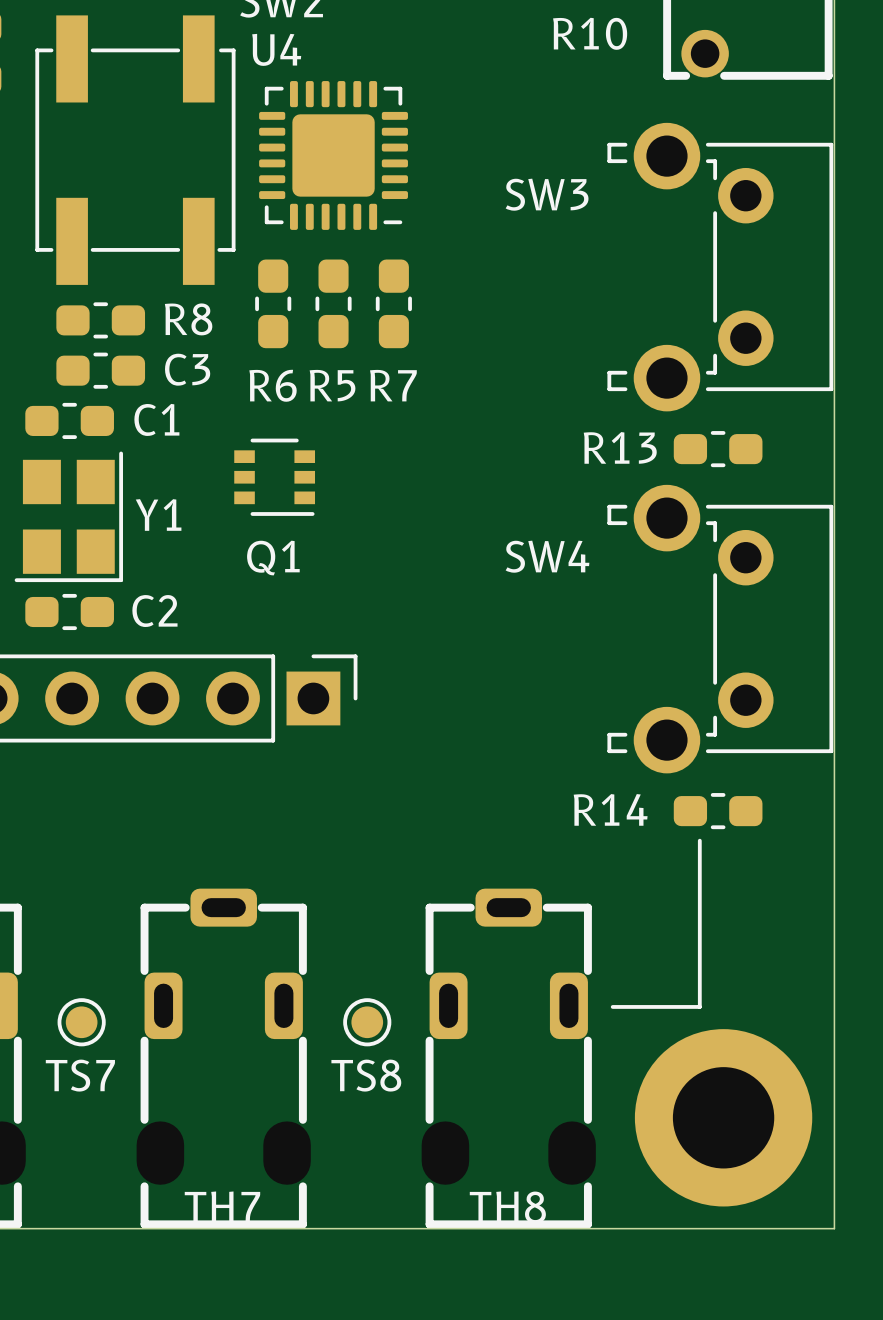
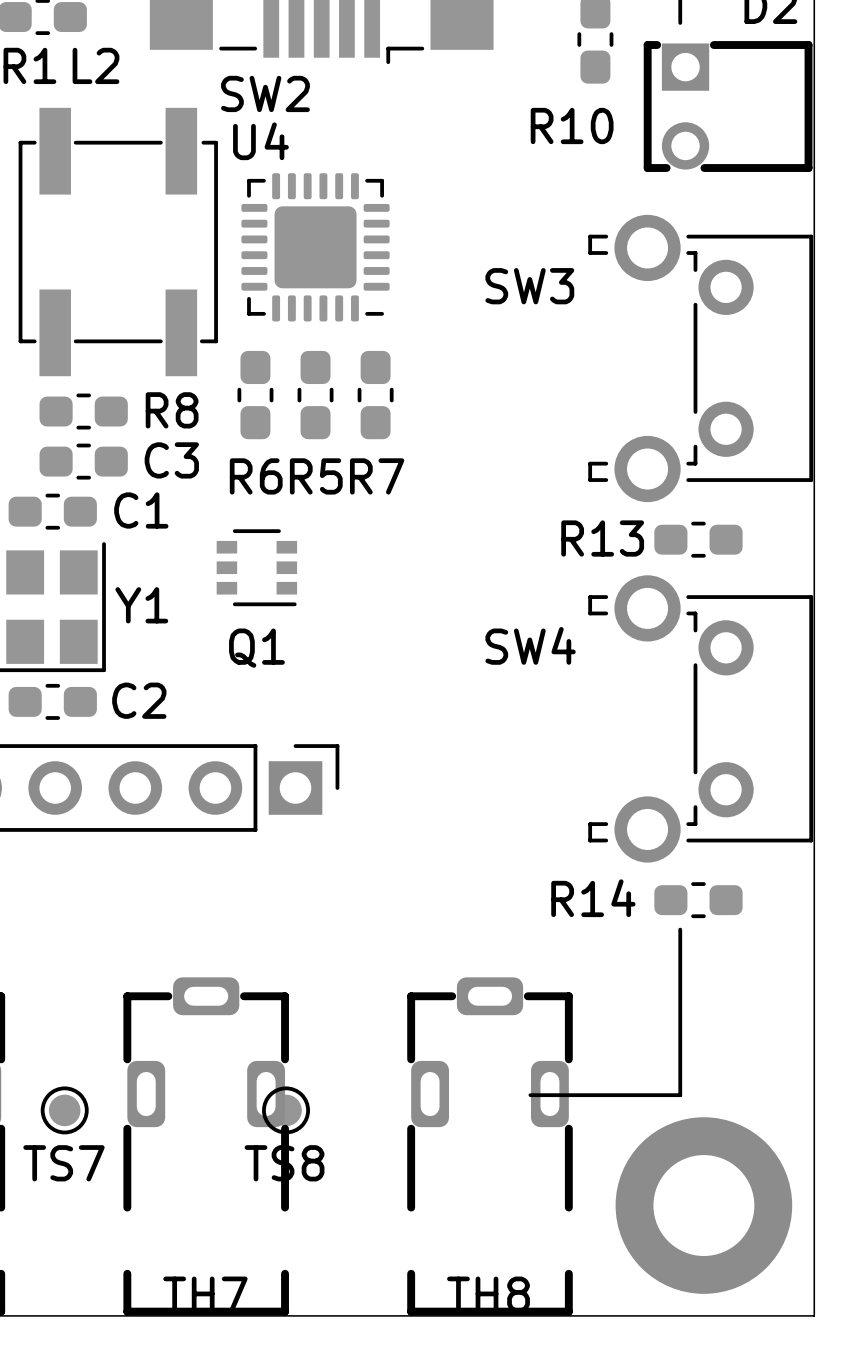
line: none -> (530, 1095) (593, 1095)
TS8 position: (367, 1022) -> (286, 1110)

